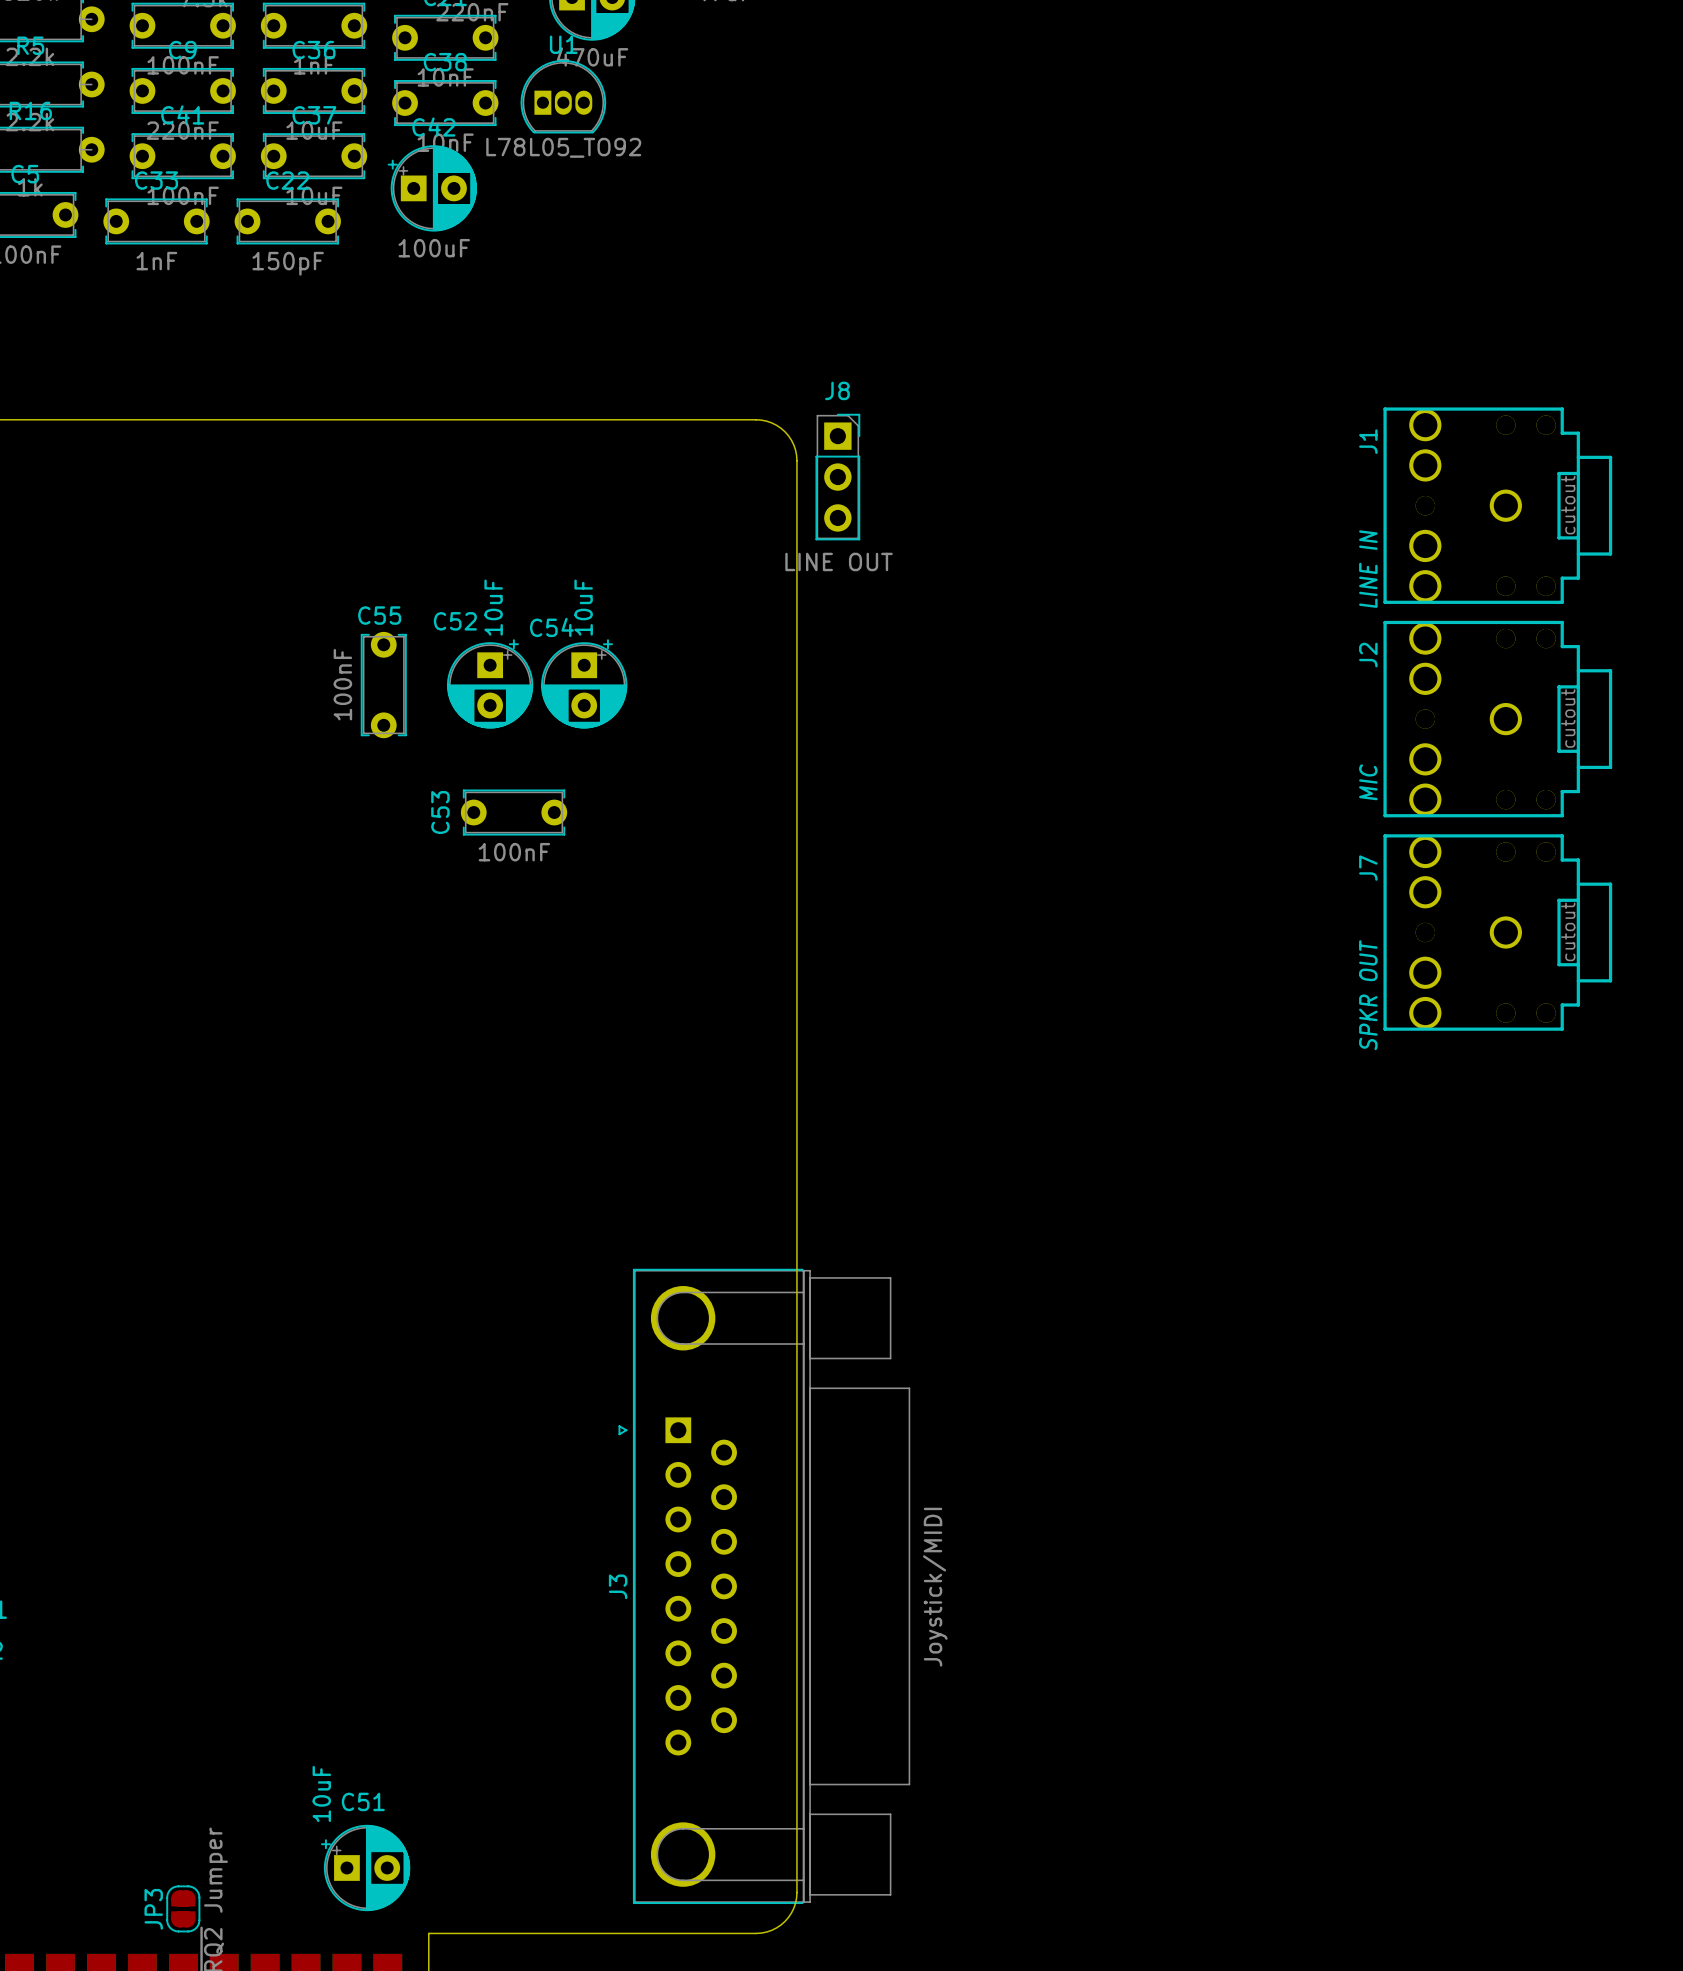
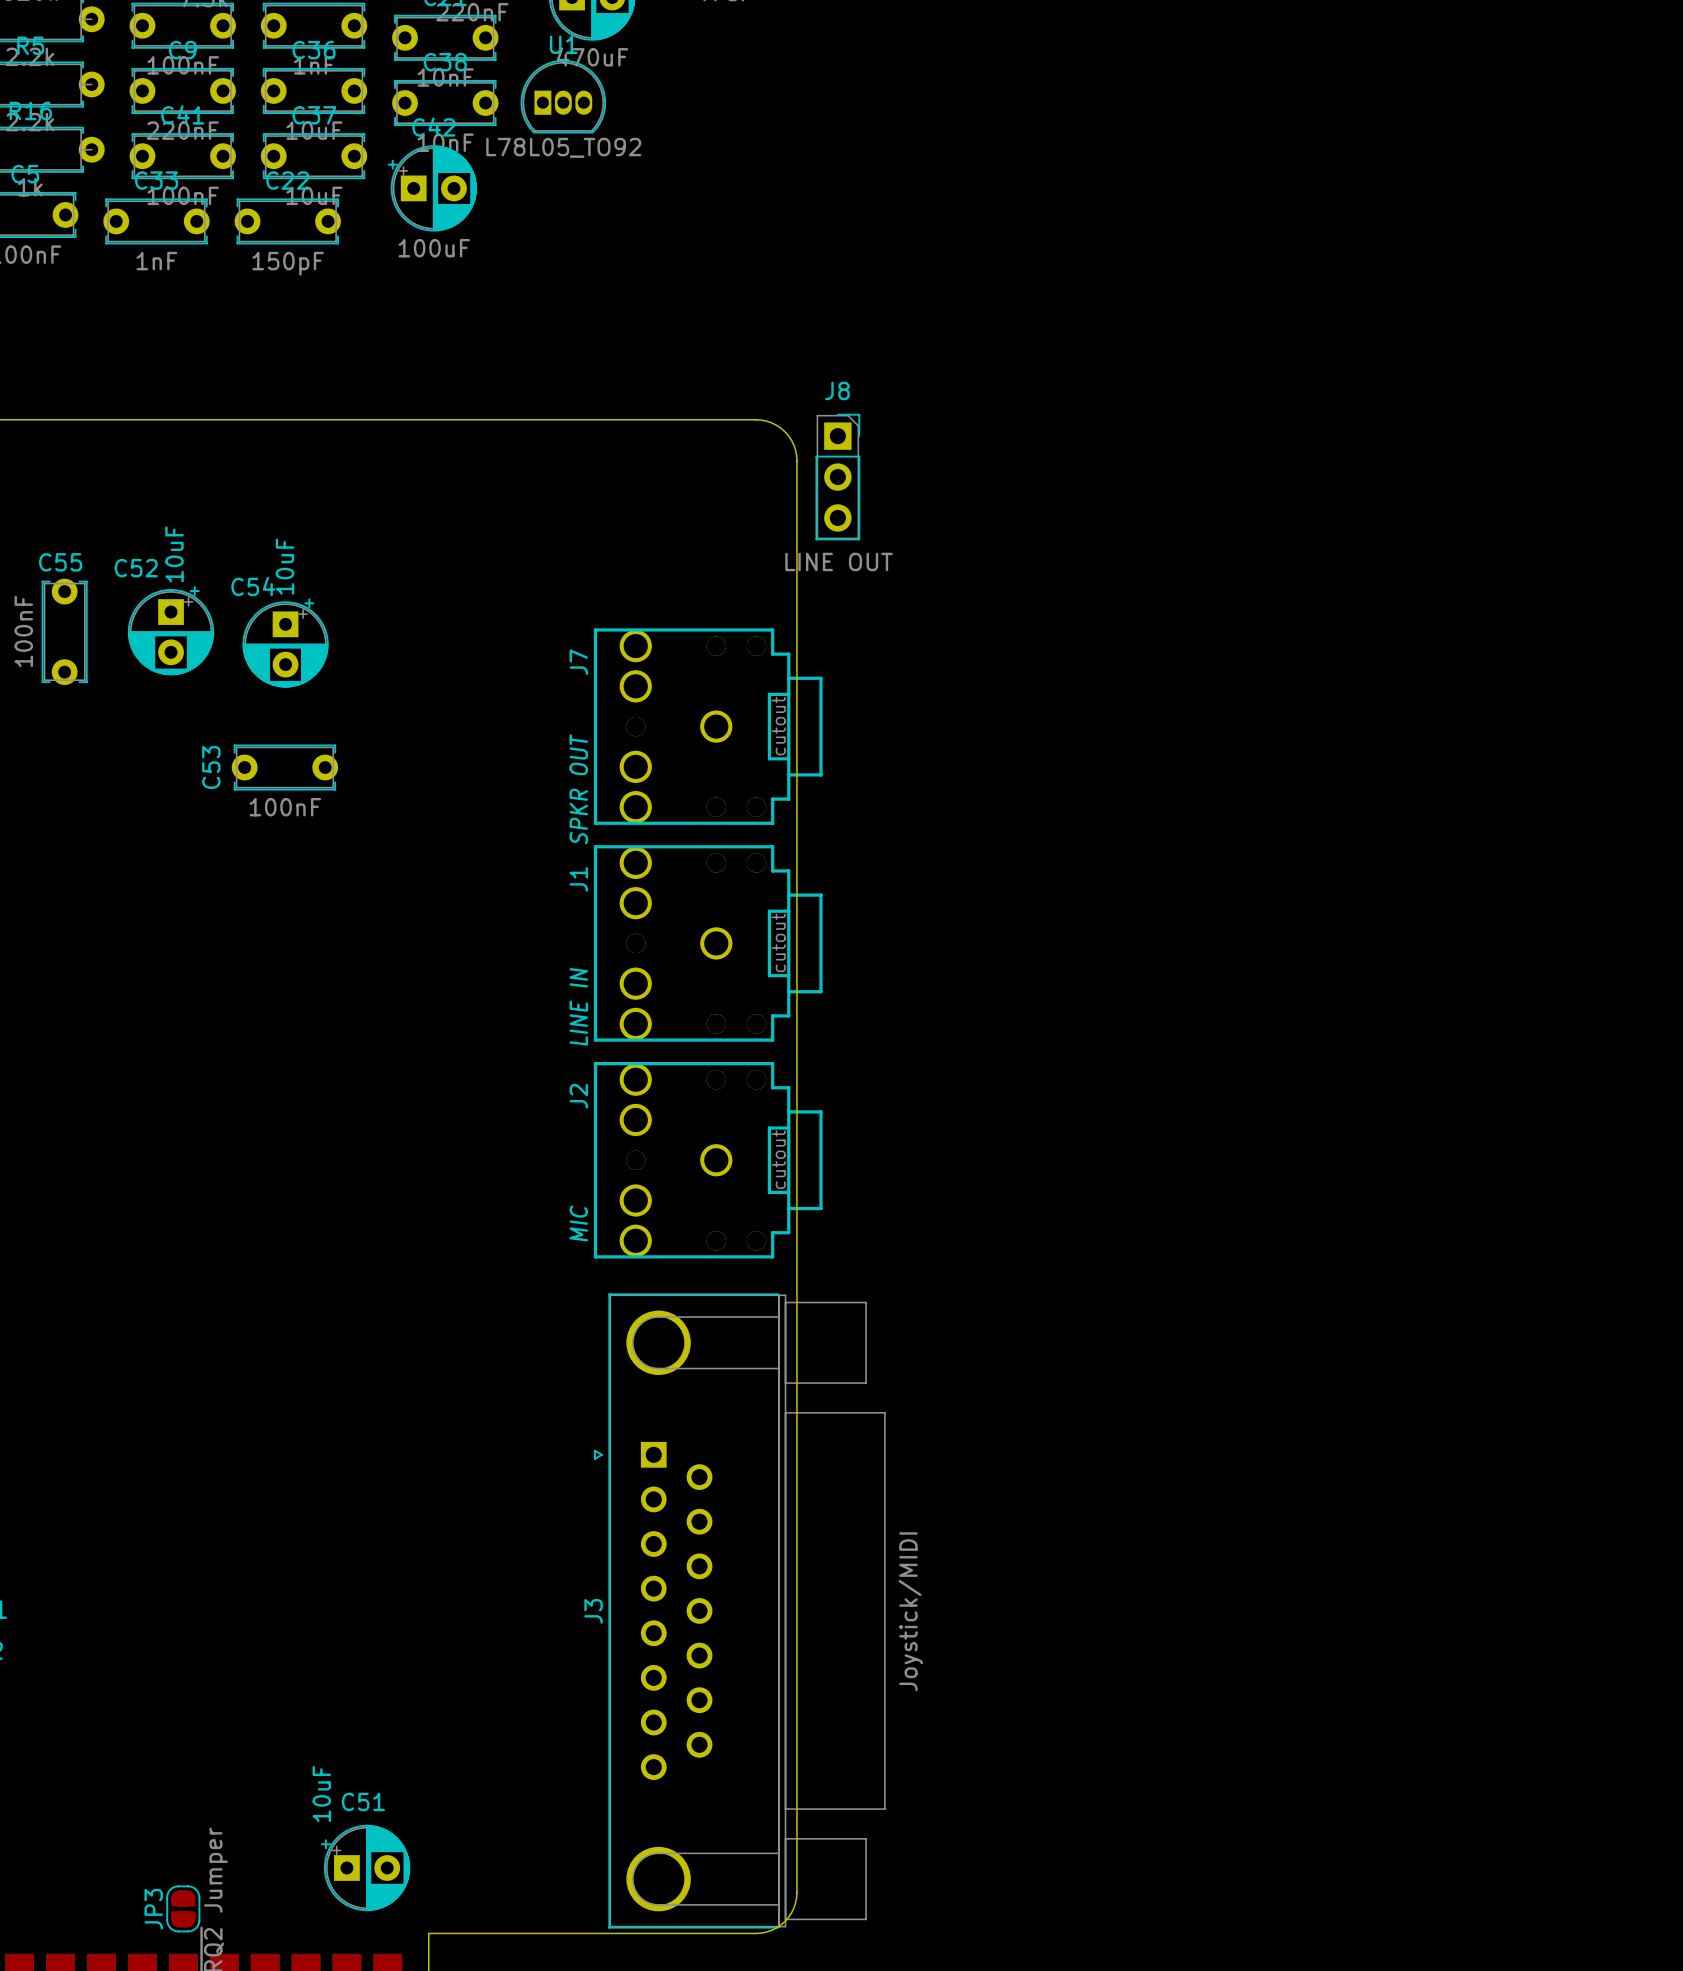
J1 position: (1497, 505) -> (708, 943)
C52 position: (490, 683) -> (171, 630)
C54 position: (584, 683) -> (285, 642)
C55 position: (383, 685) -> (64, 631)
J2 position: (1497, 719) -> (708, 1160)
C53 position: (514, 812) -> (284, 767)
J7 position: (1497, 932) -> (708, 726)
J3 position: (764, 1586) -> (739, 1610)

